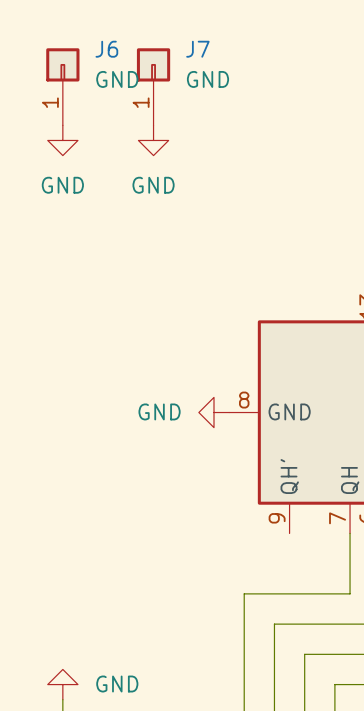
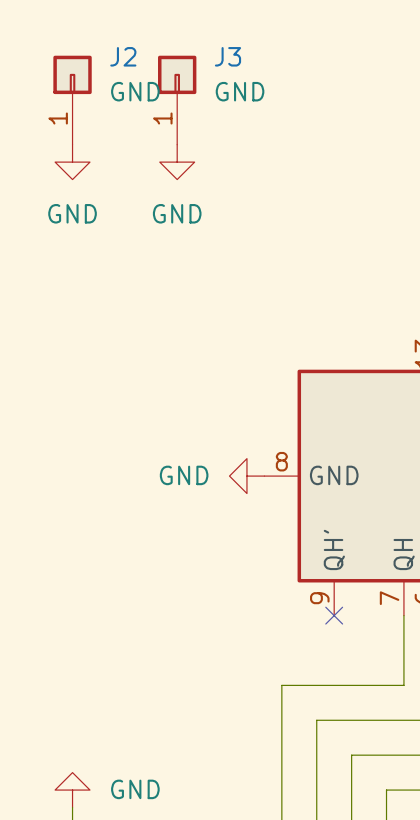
J6 name: J6 (106, 49) -> J2 (123, 56)
J7 name: J7 (197, 49) -> J3 (227, 56)
no-connect mark: none -> (334, 615)

